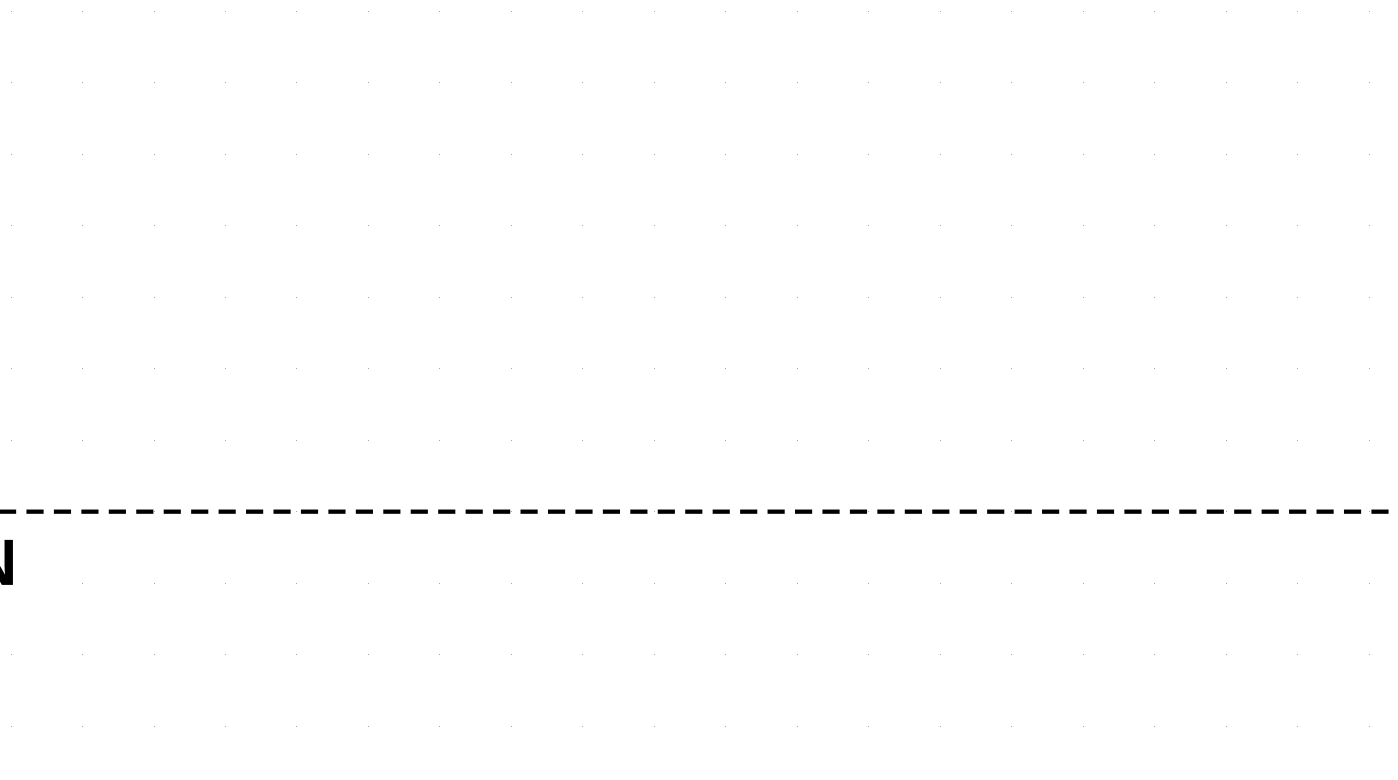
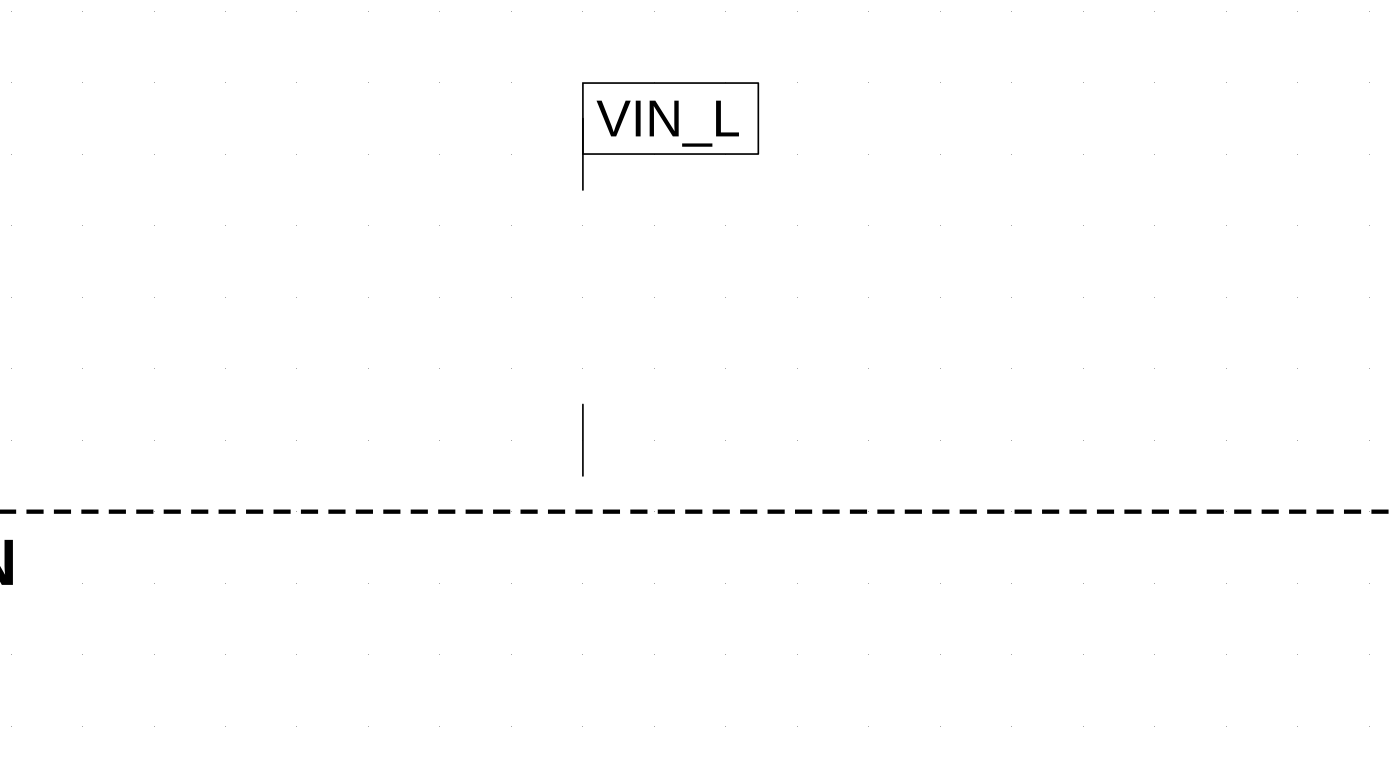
wire: none -> (582, 118) (582, 190)
global label: none -> VIN_L (667, 123)
wire: none -> (582, 404) (582, 475)

